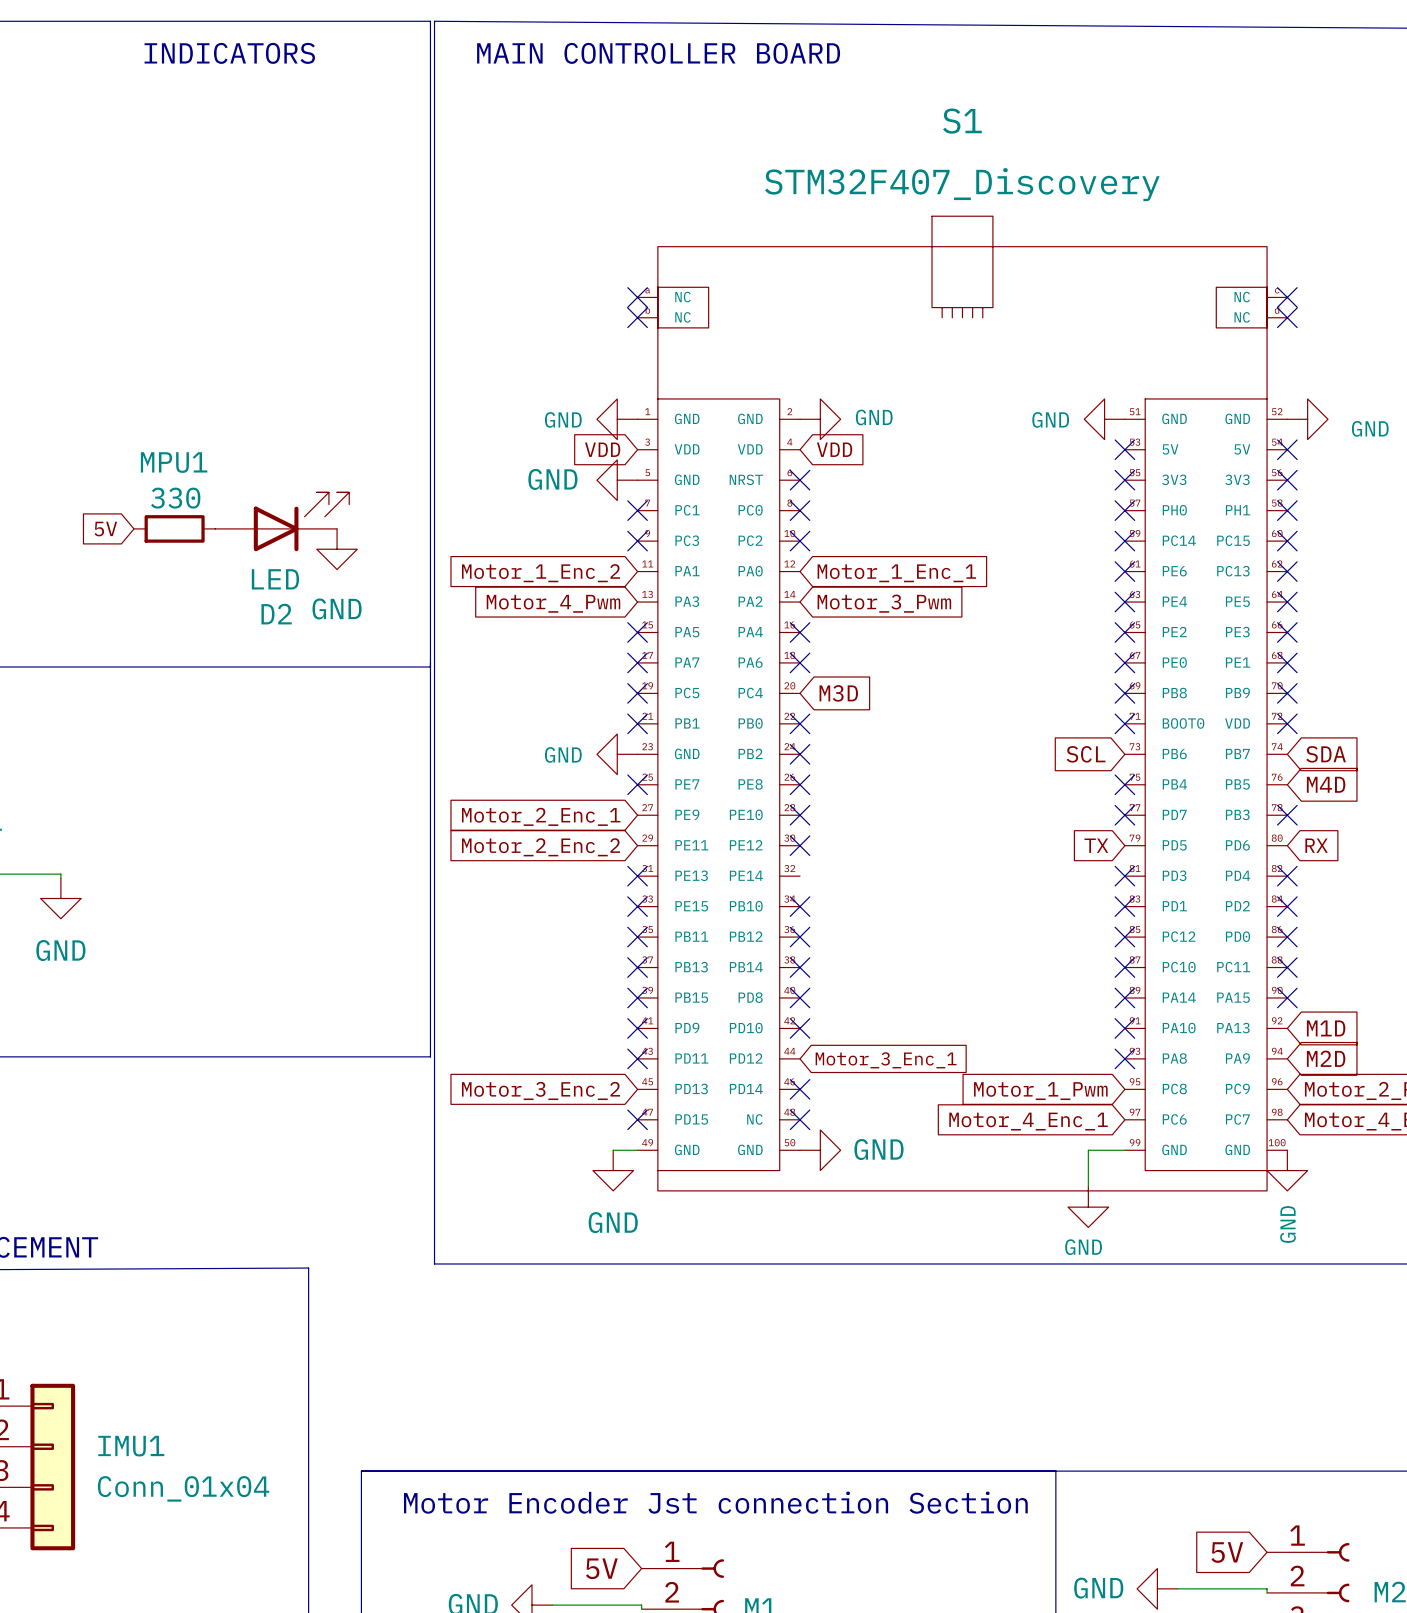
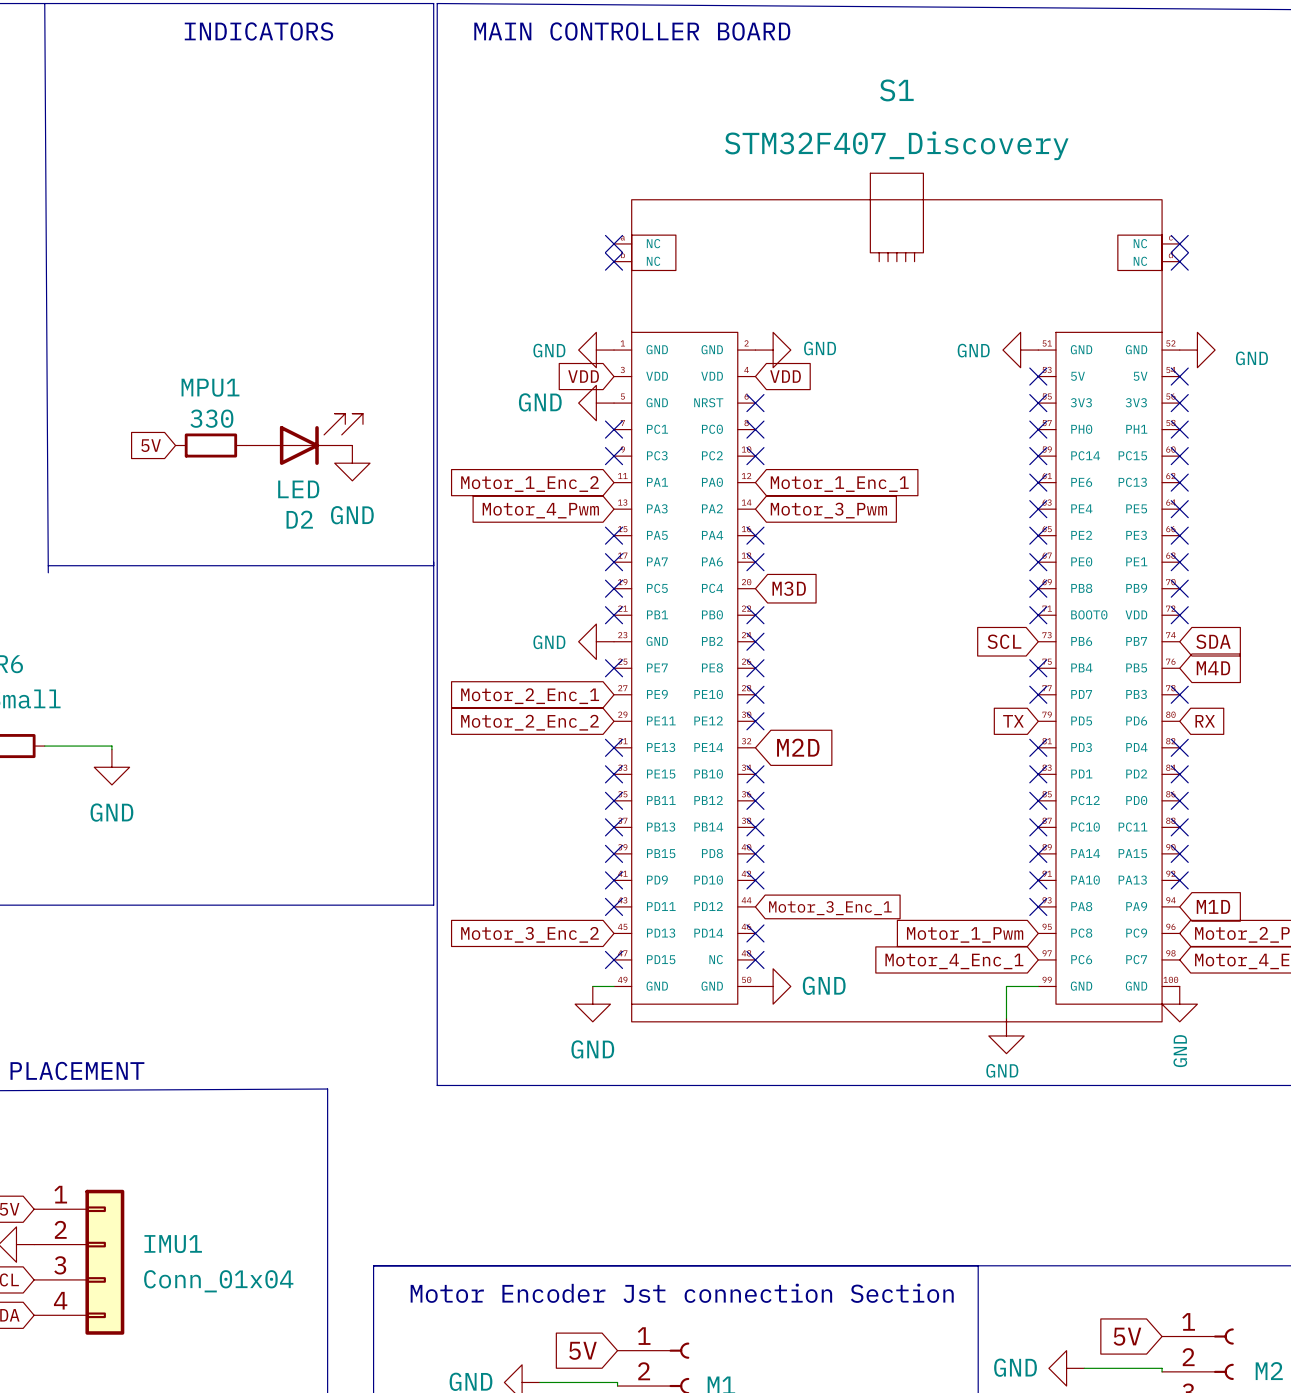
global label: none -> M2D (798, 747)
no-connect mark: none -> (1179, 880)
global label: M1D (1326, 1028) -> none
global label: M2D (1326, 1058) -> M1D (1213, 906)

